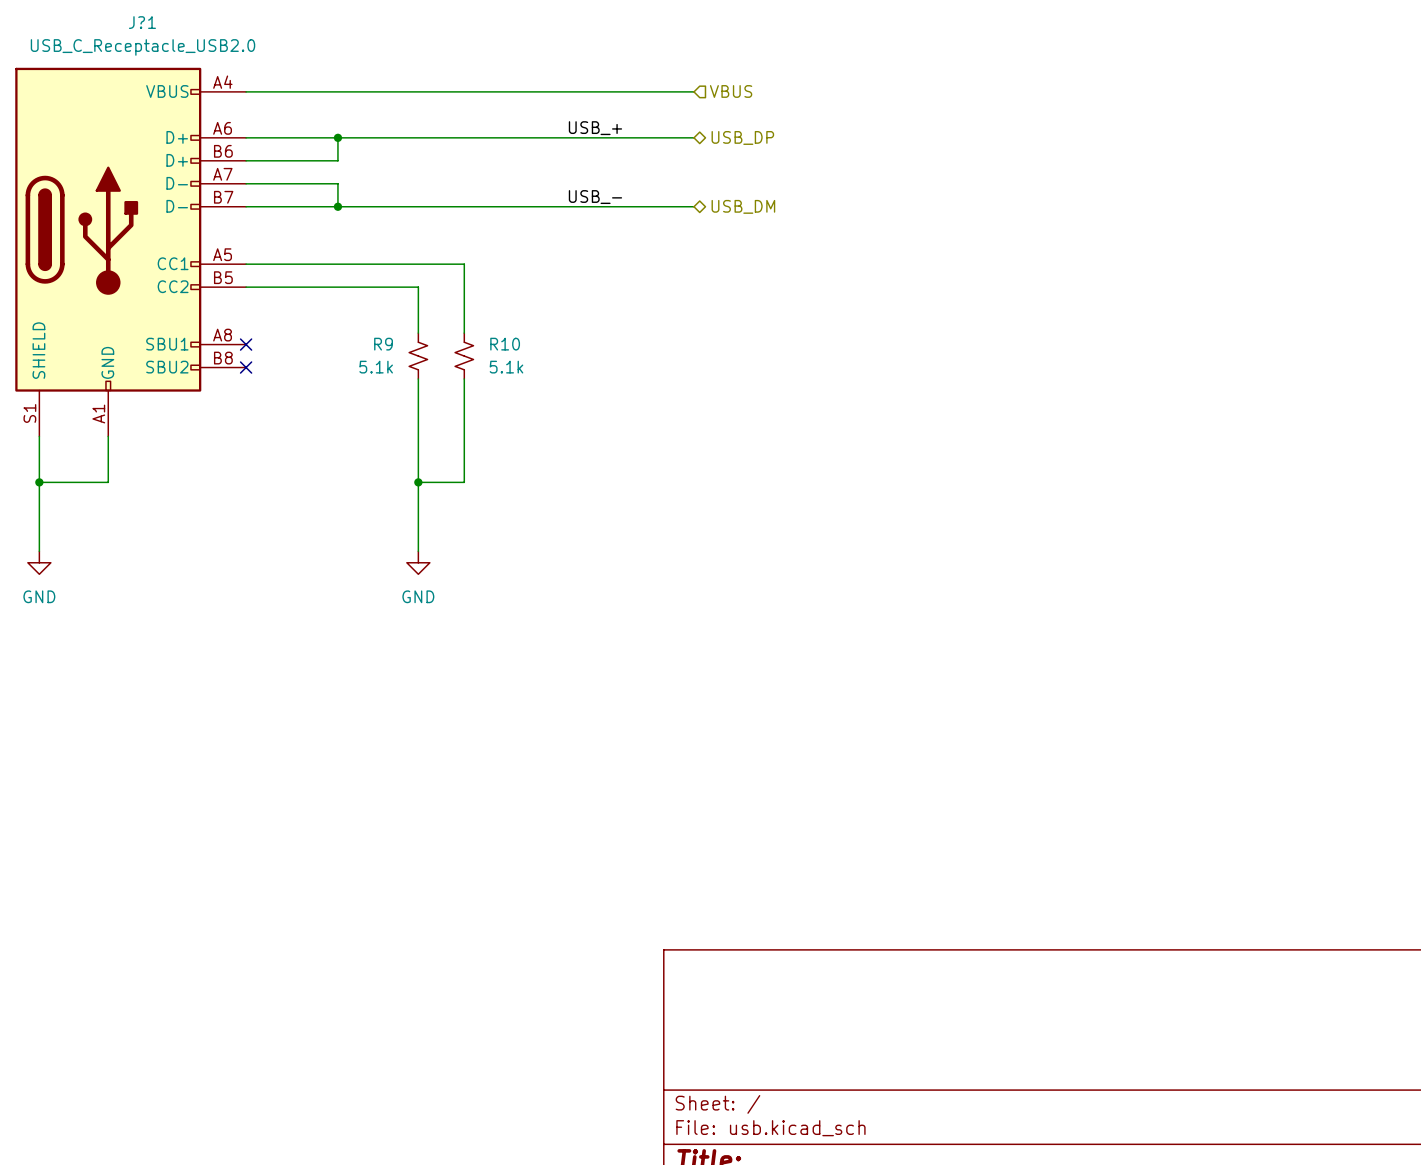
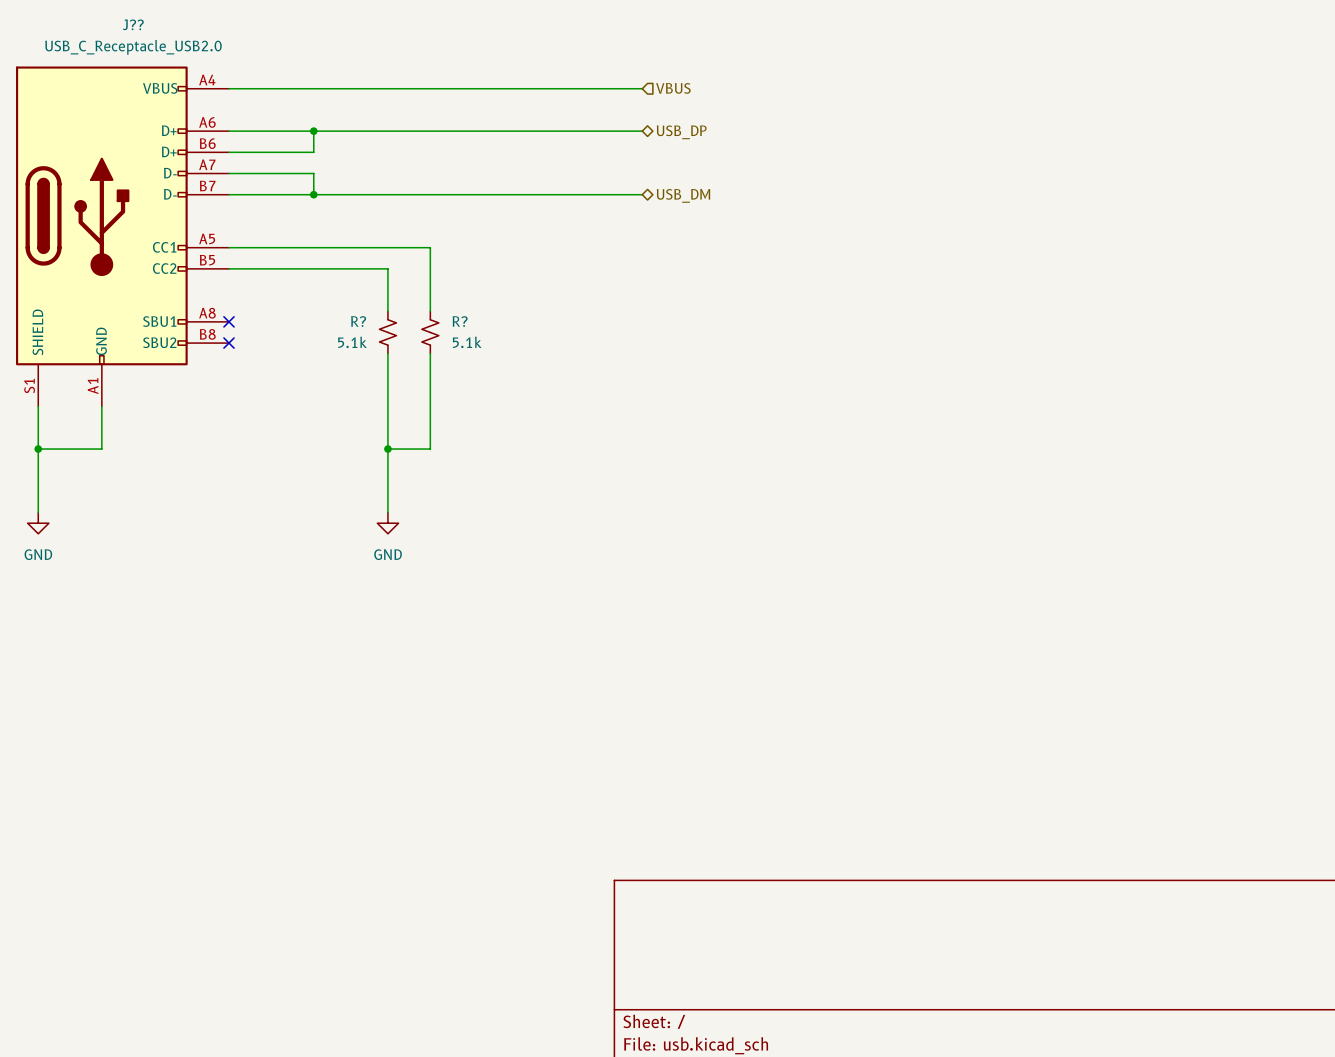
J?1 name: J?1 (142, 22) -> J?? (133, 24)
label: USB_+ (595, 128) -> none
label: USB_- (595, 197) -> none
R9 name: R9 (383, 344) -> R? (358, 321)
R10 name: R10 (505, 344) -> R? (460, 321)

